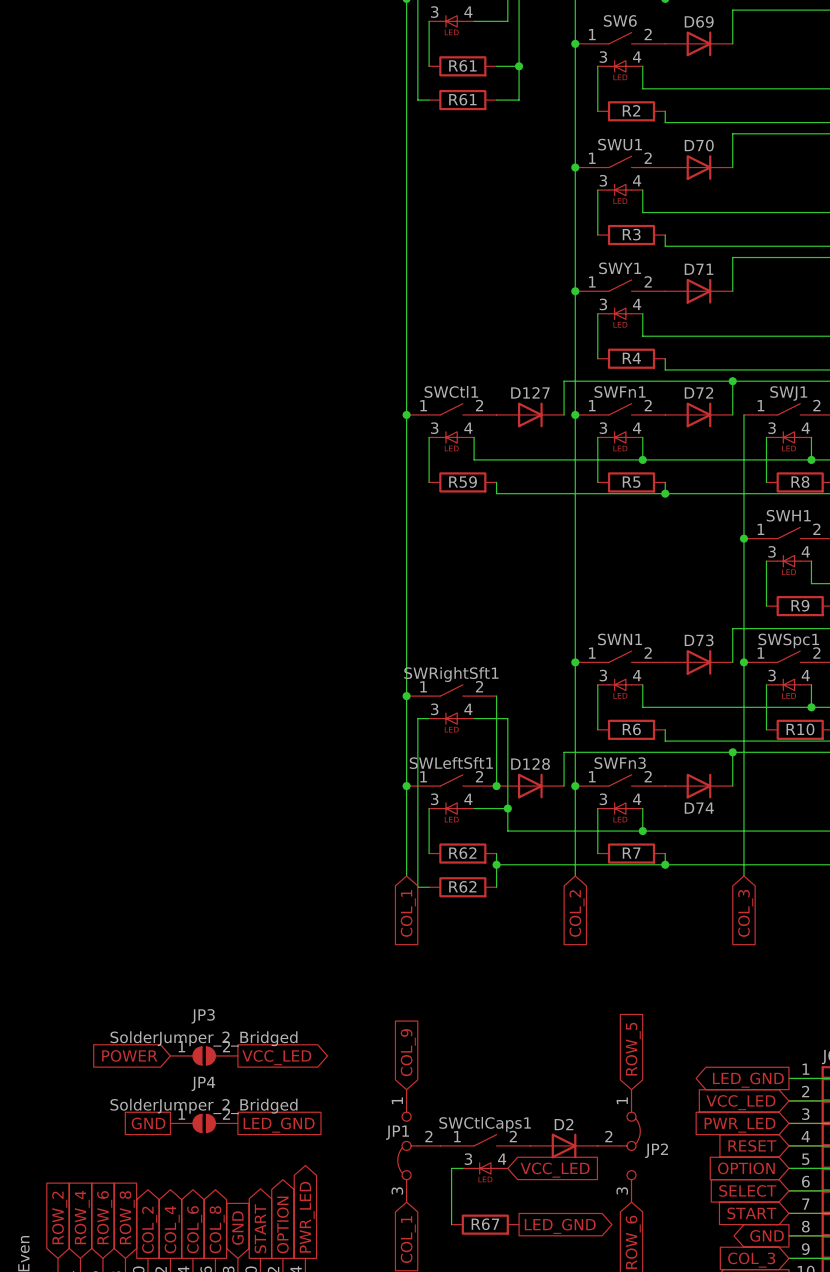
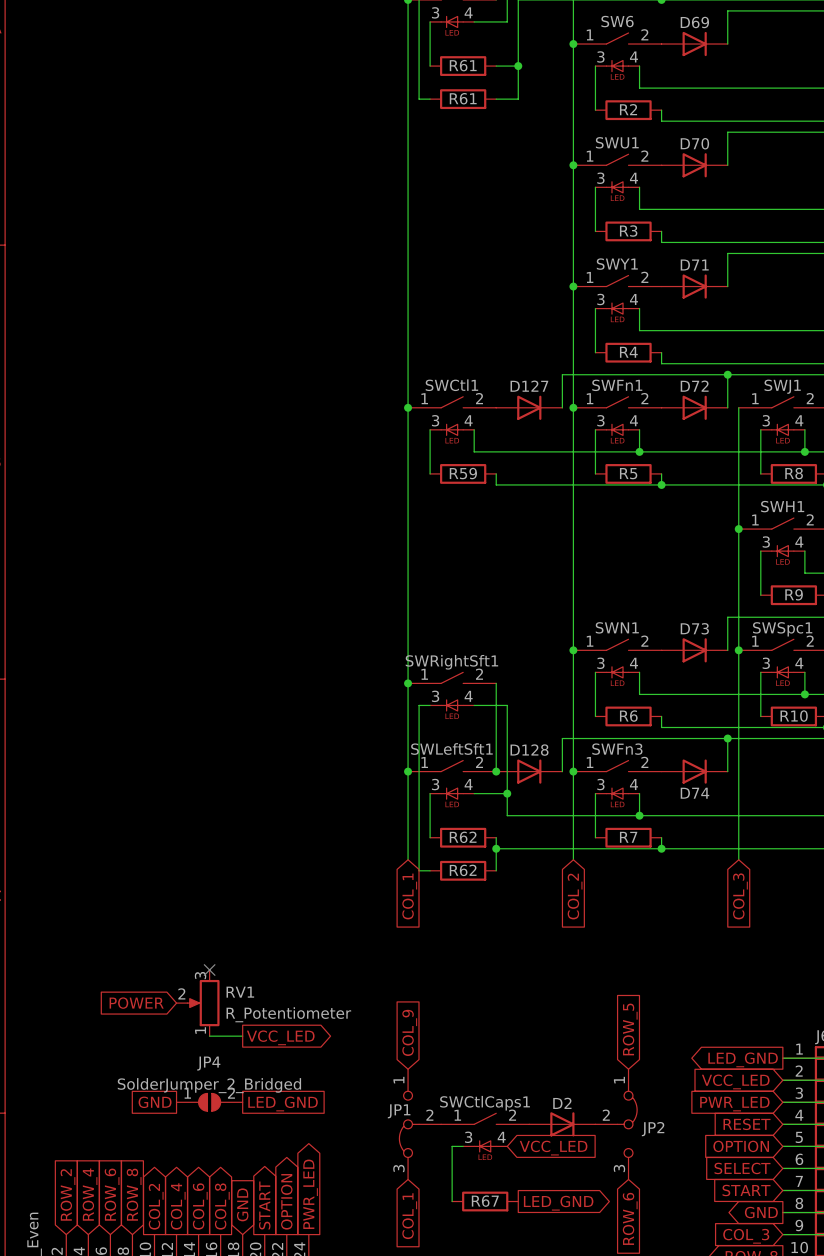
no-connect mark: none -> (209, 970)
RV1: none -> R_Potentiometer (198, 1003)
global label position: POWER (129, 1055) -> POWER (136, 1003)
JP3: SolderJumper_2_Bridged (204, 1055) -> none

